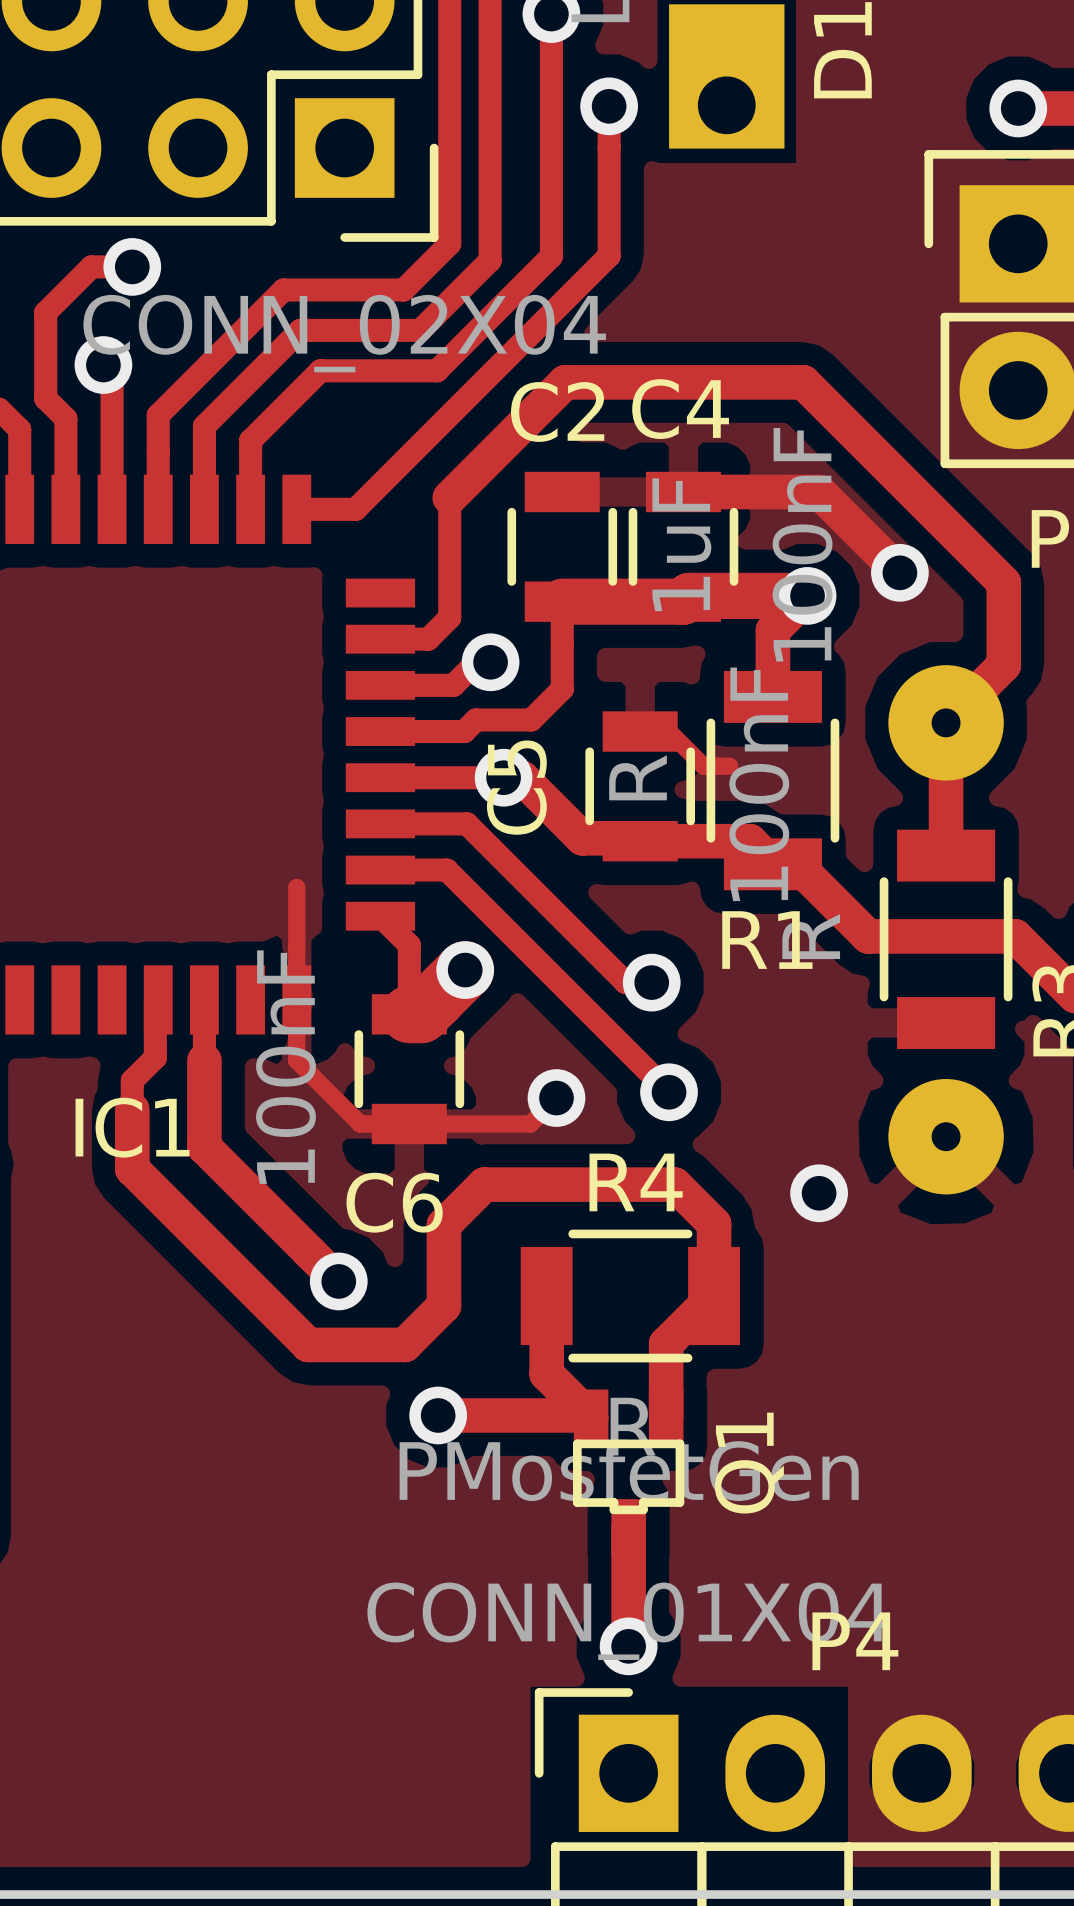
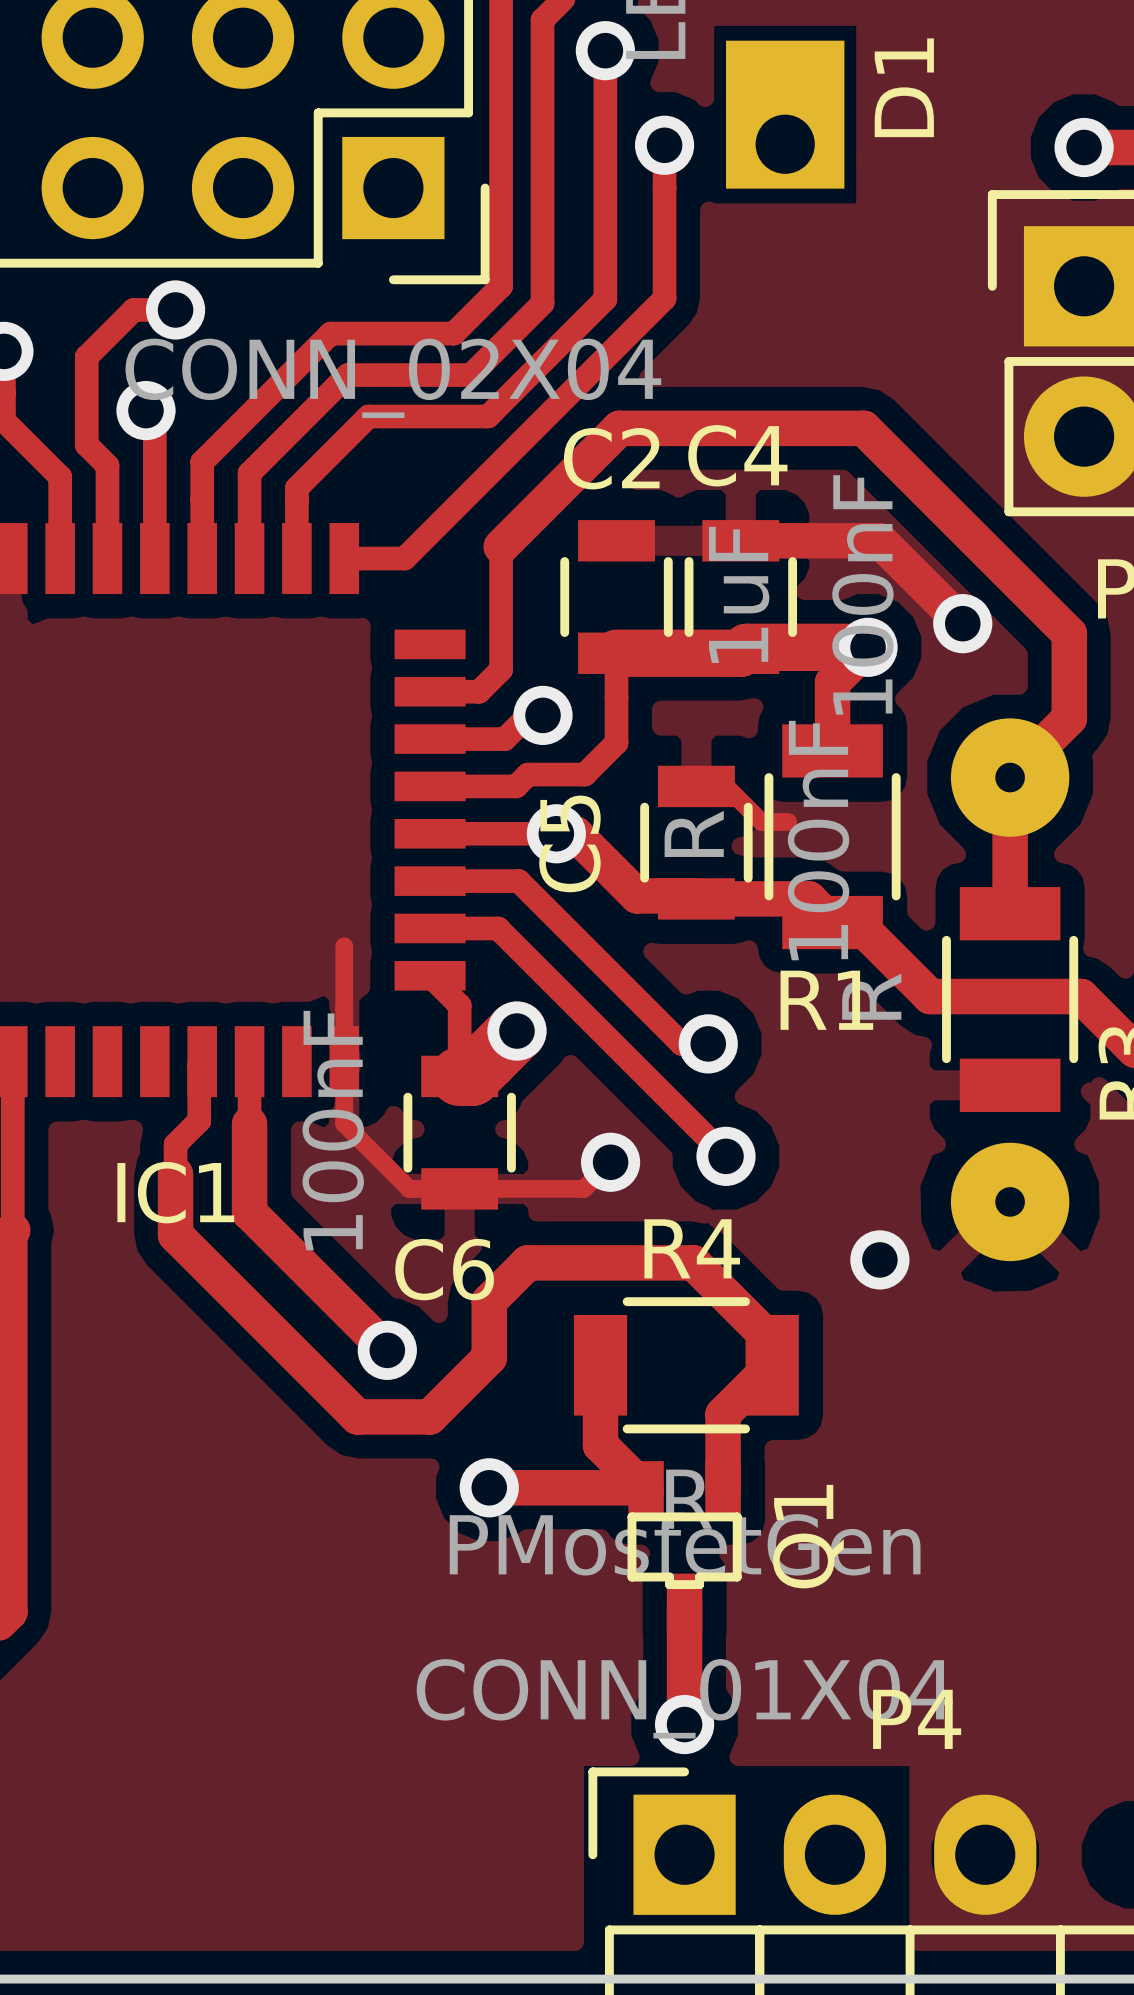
track: (714, 1272) (714, 1223) (674, 1184) (484, 1184) (443, 1225) (443, 1305) (404, 1344) (308, 1344) -> (772, 1341) (693, 1262) (527, 1262) (489, 1301) (489, 1357) (429, 1416) (356, 1415)

